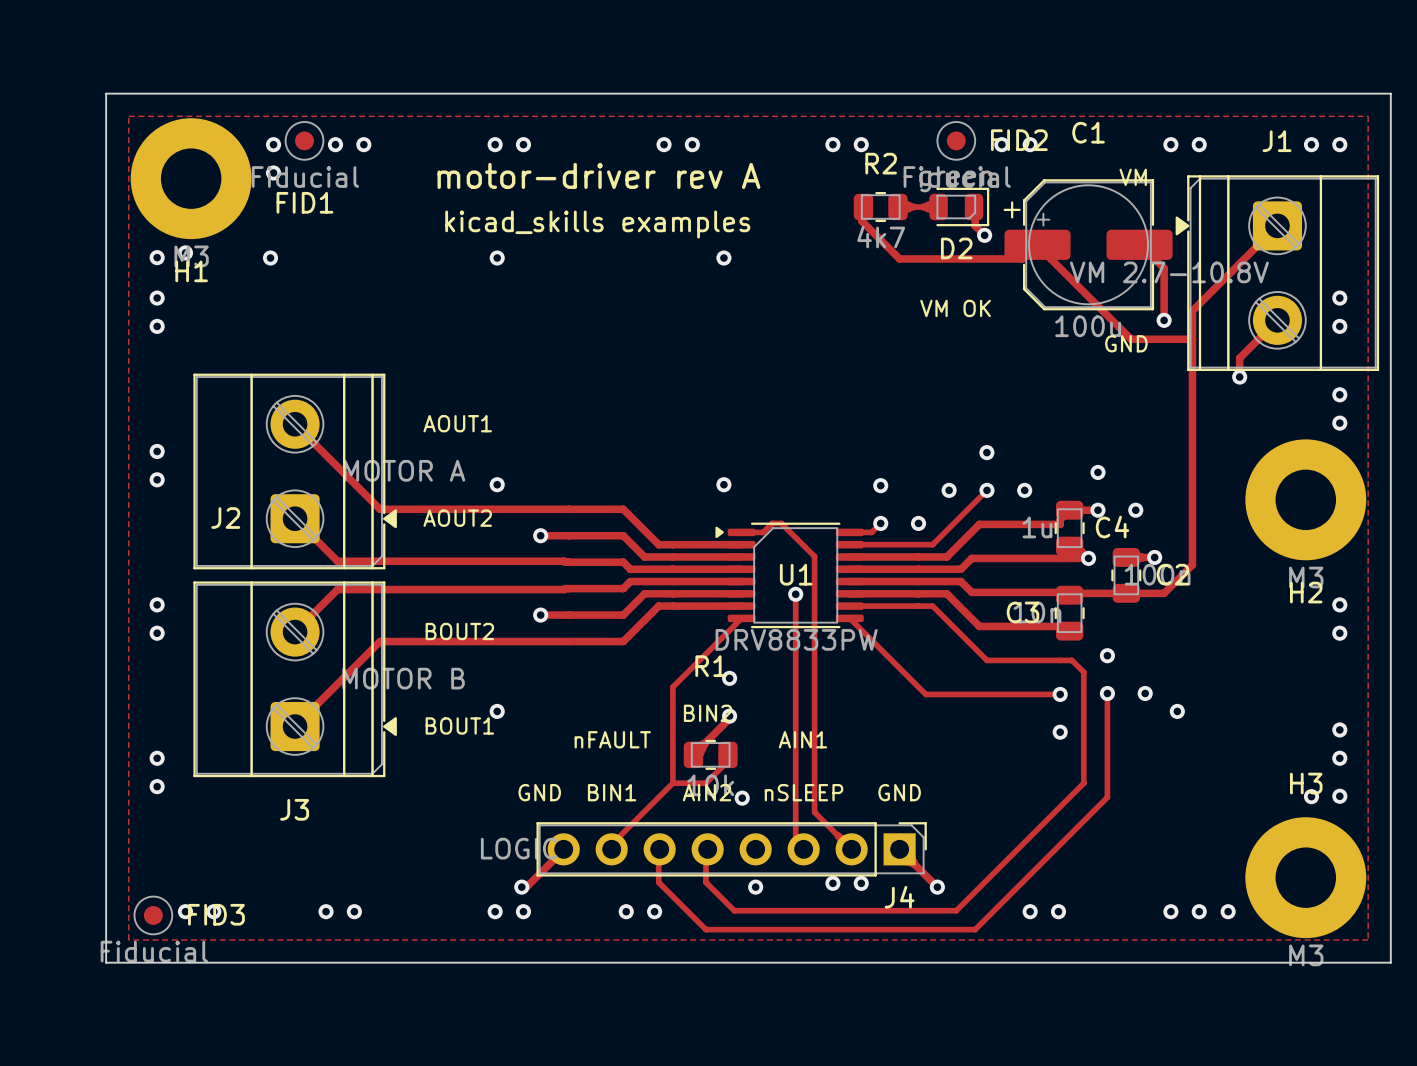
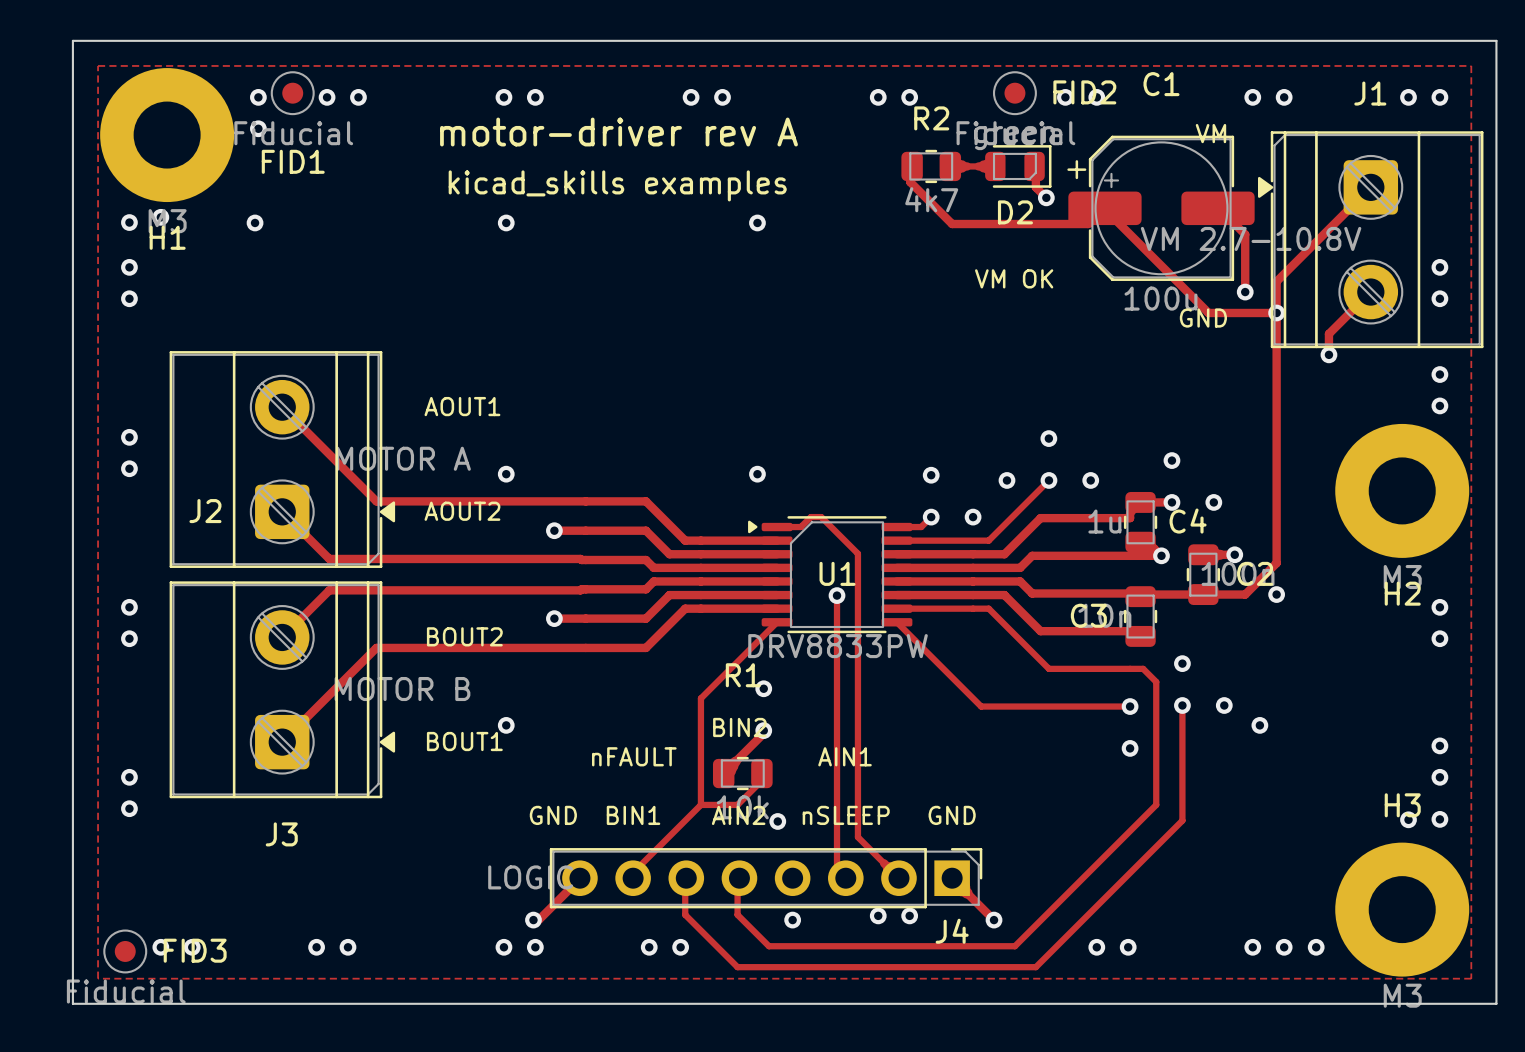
via: none -> (1276, 312)
via: none -> (1276, 594)

